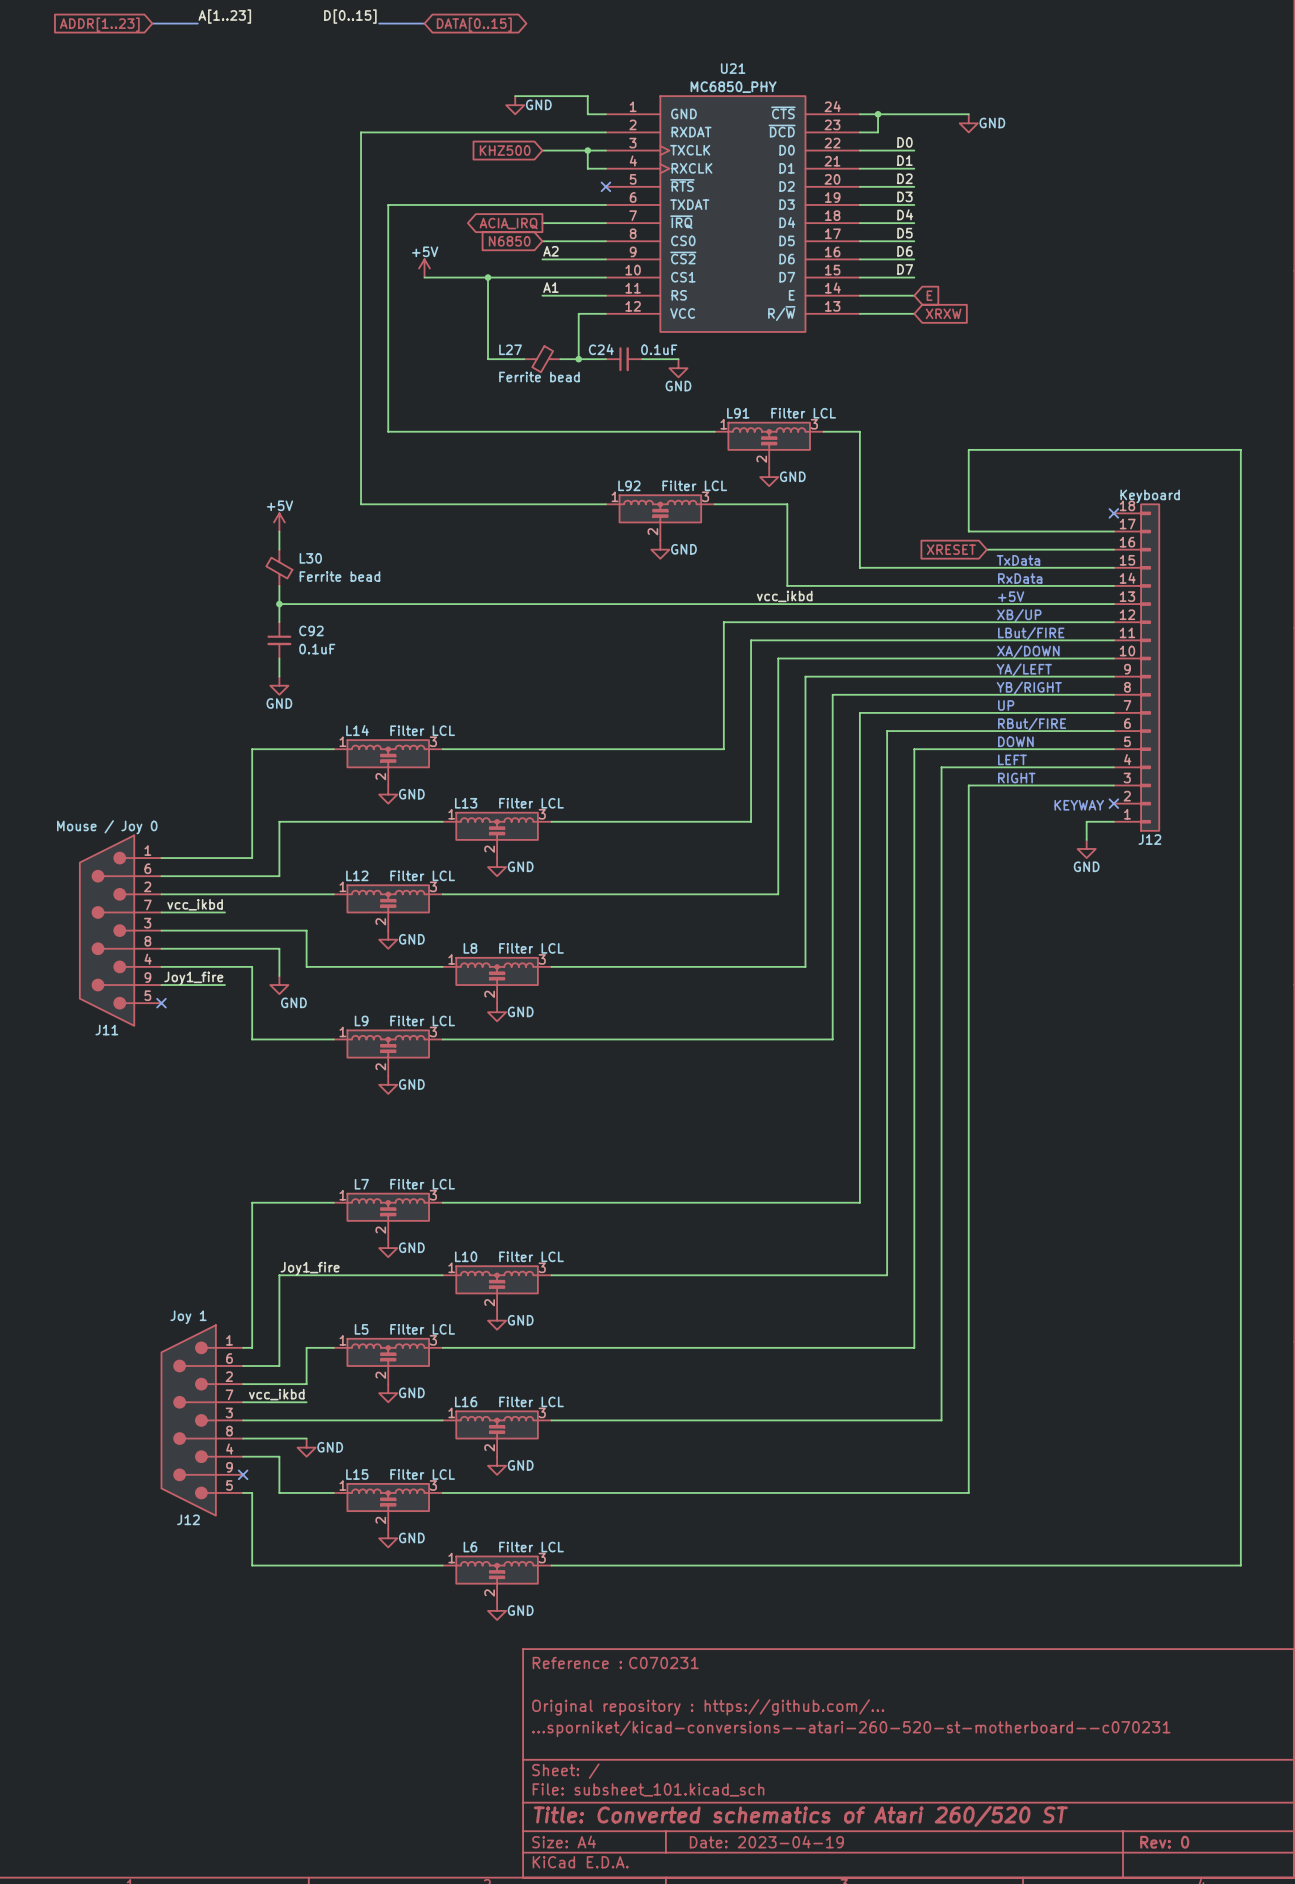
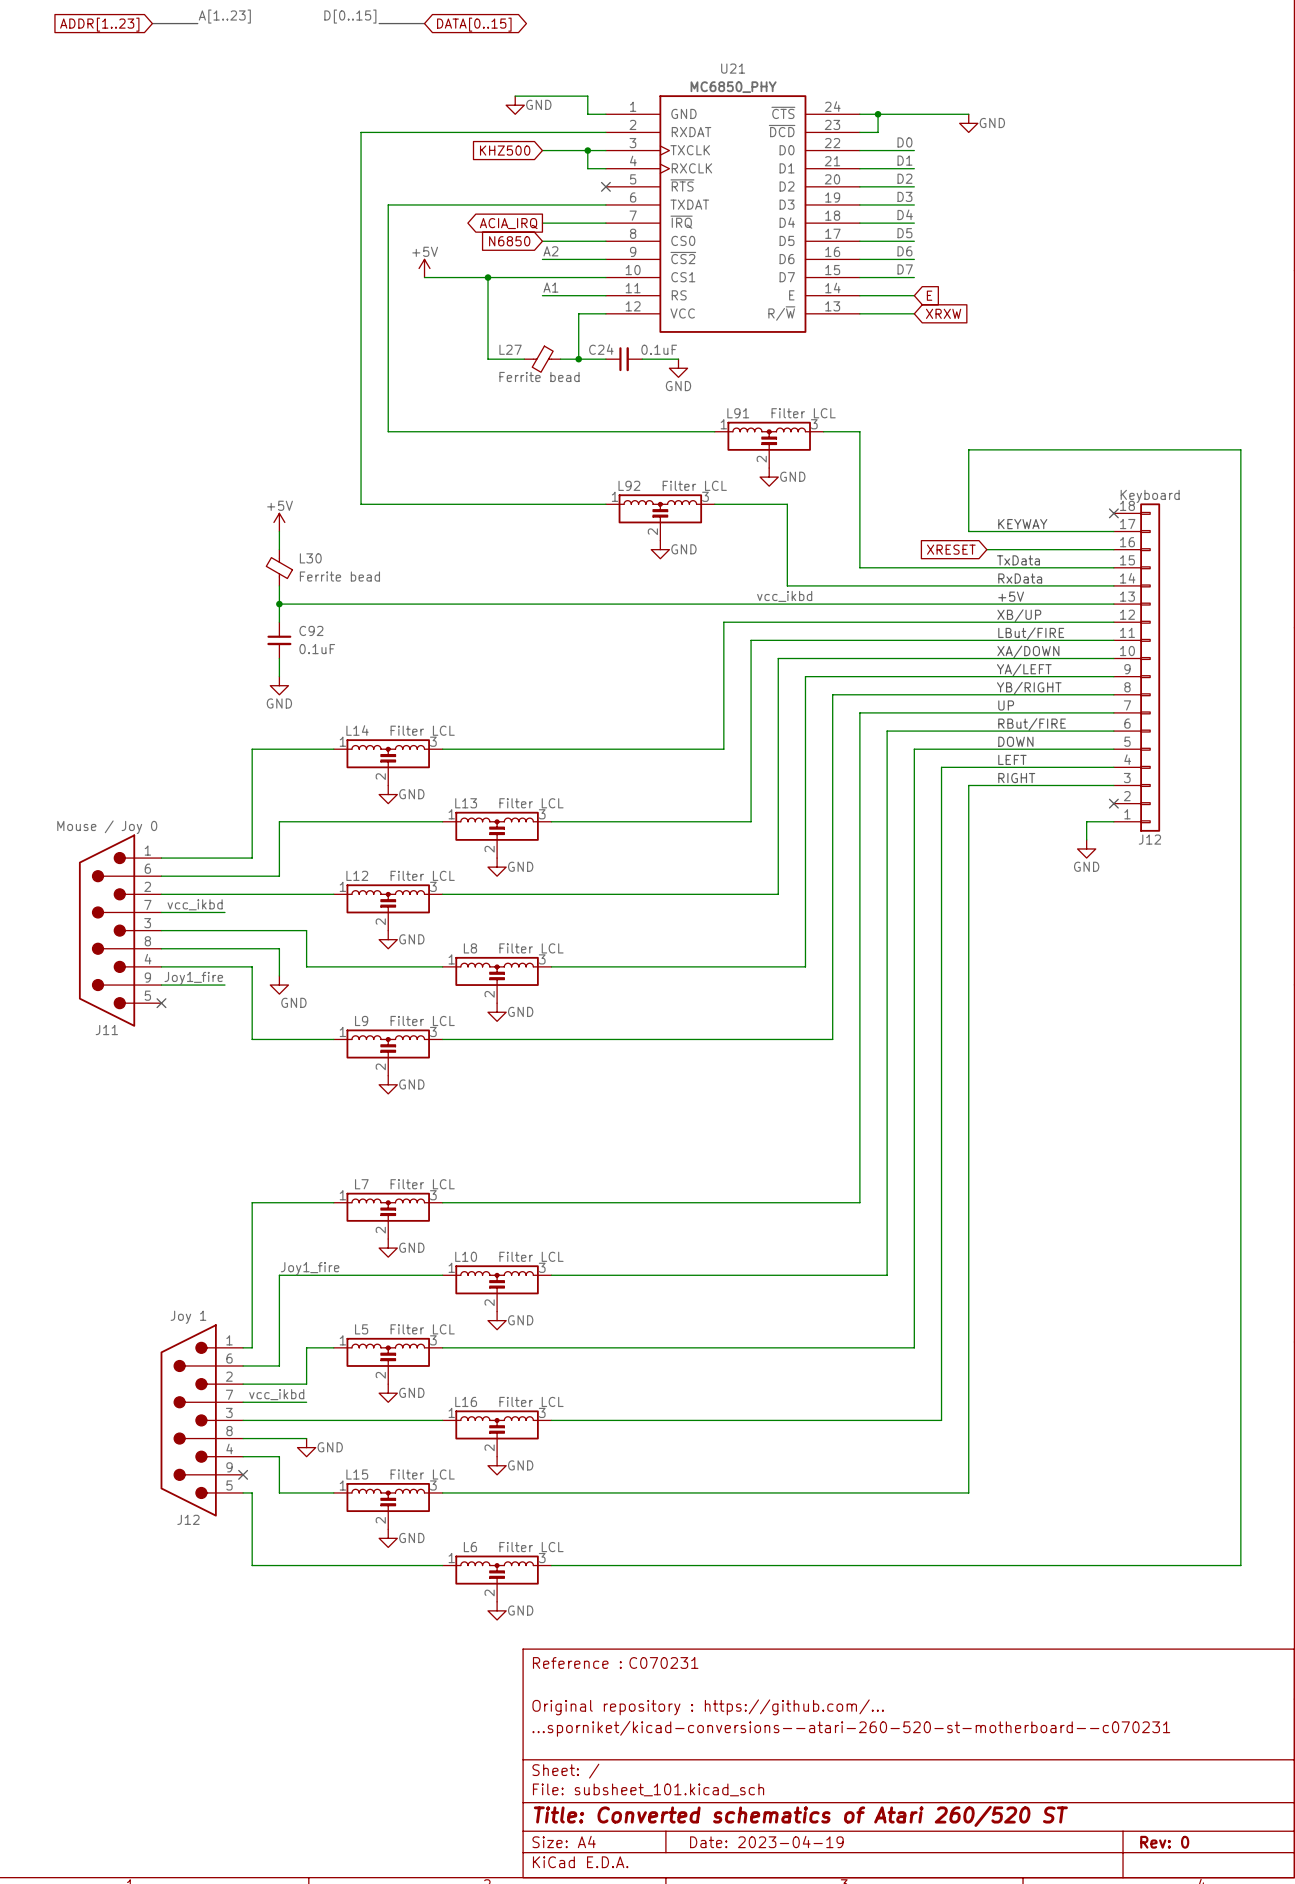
text: none -> KEYWAY (1022, 524)
text: KEYWAY (1079, 805) -> none

